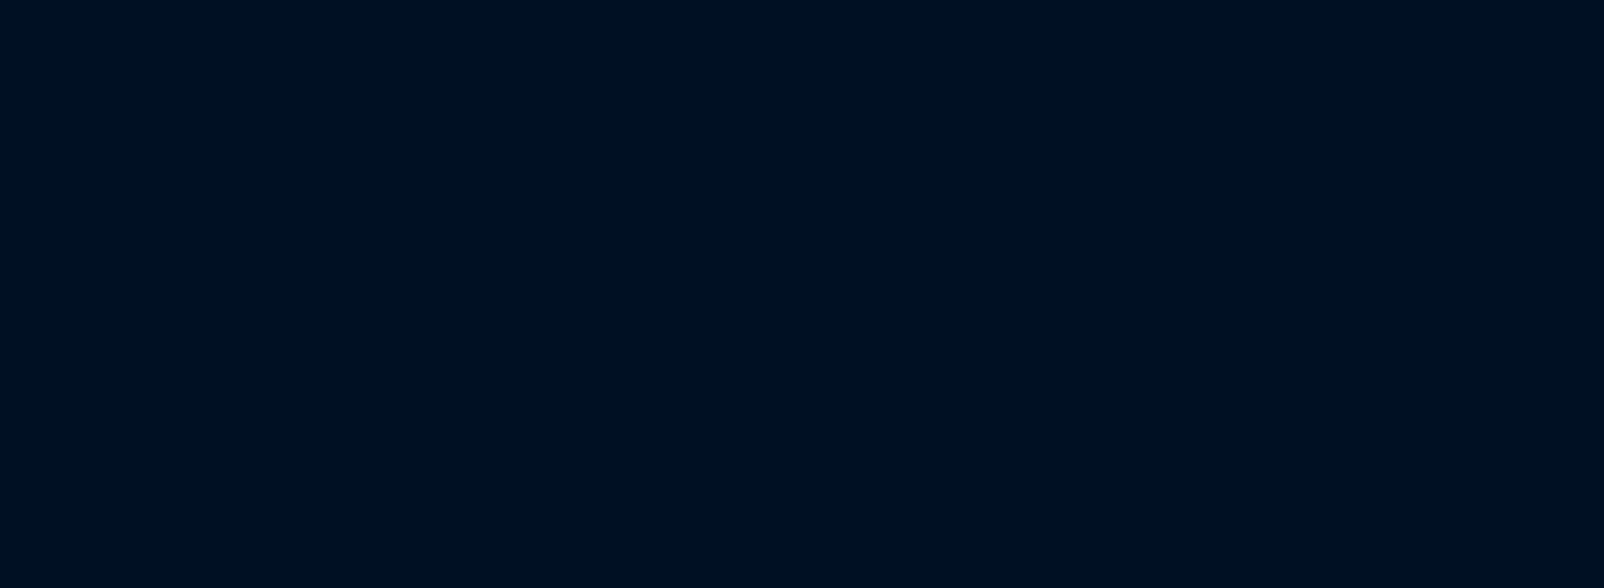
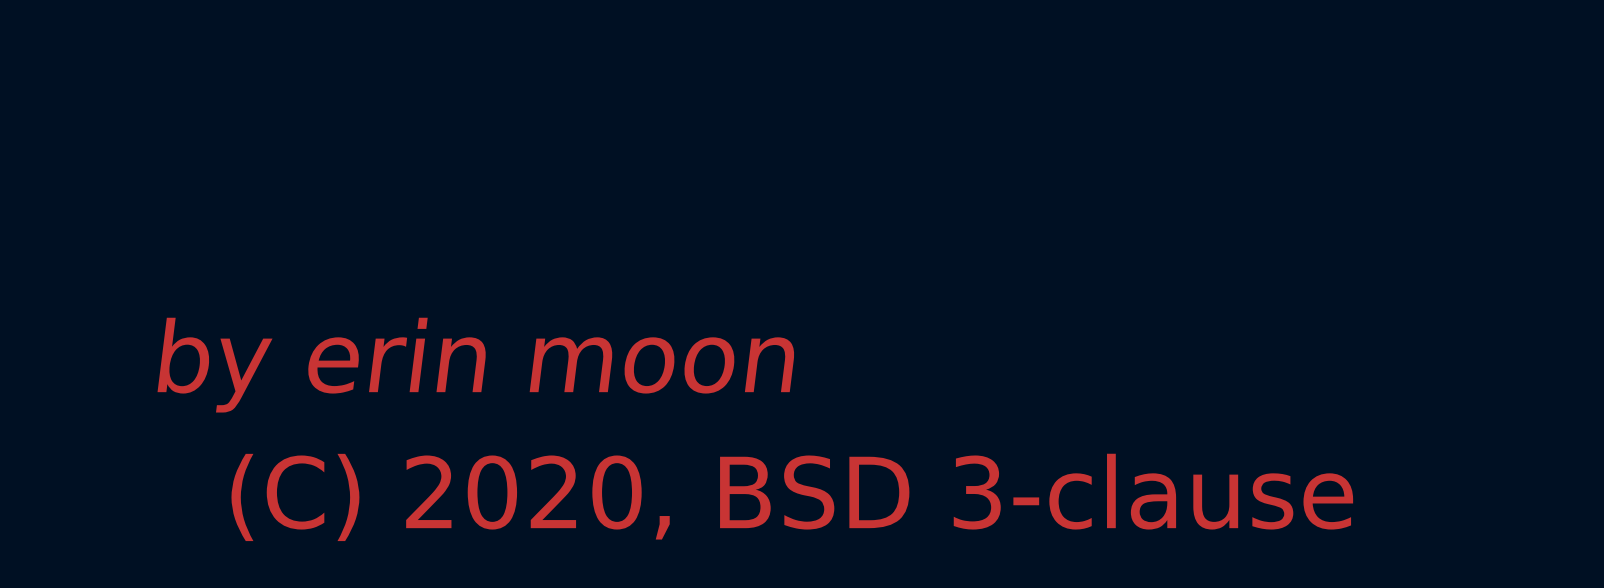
text: none -> by erin moon (476, 365)
text: none -> (C) 2020, BSD 3-clause (792, 497)

